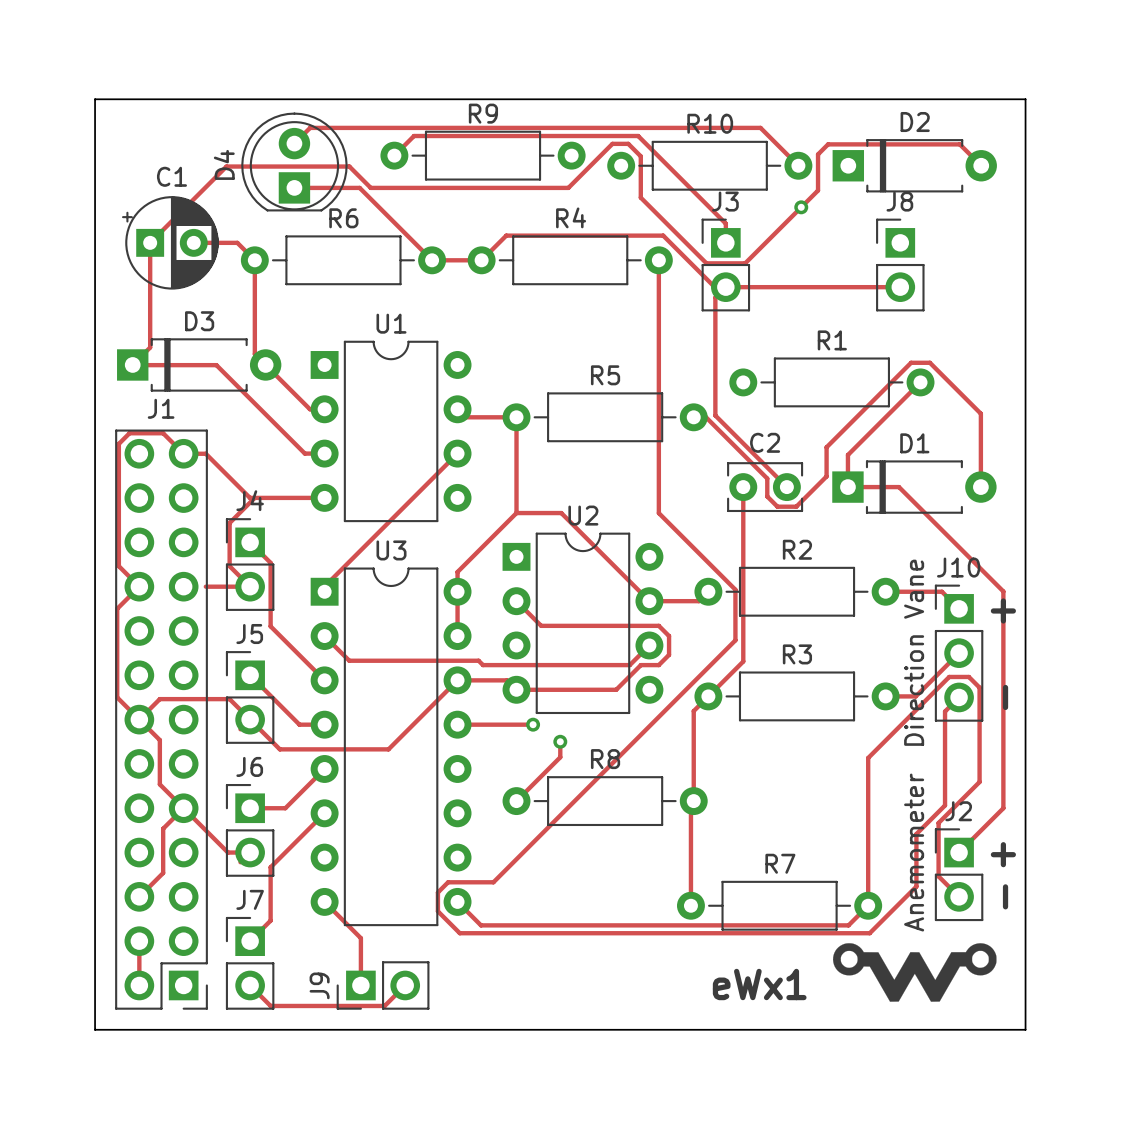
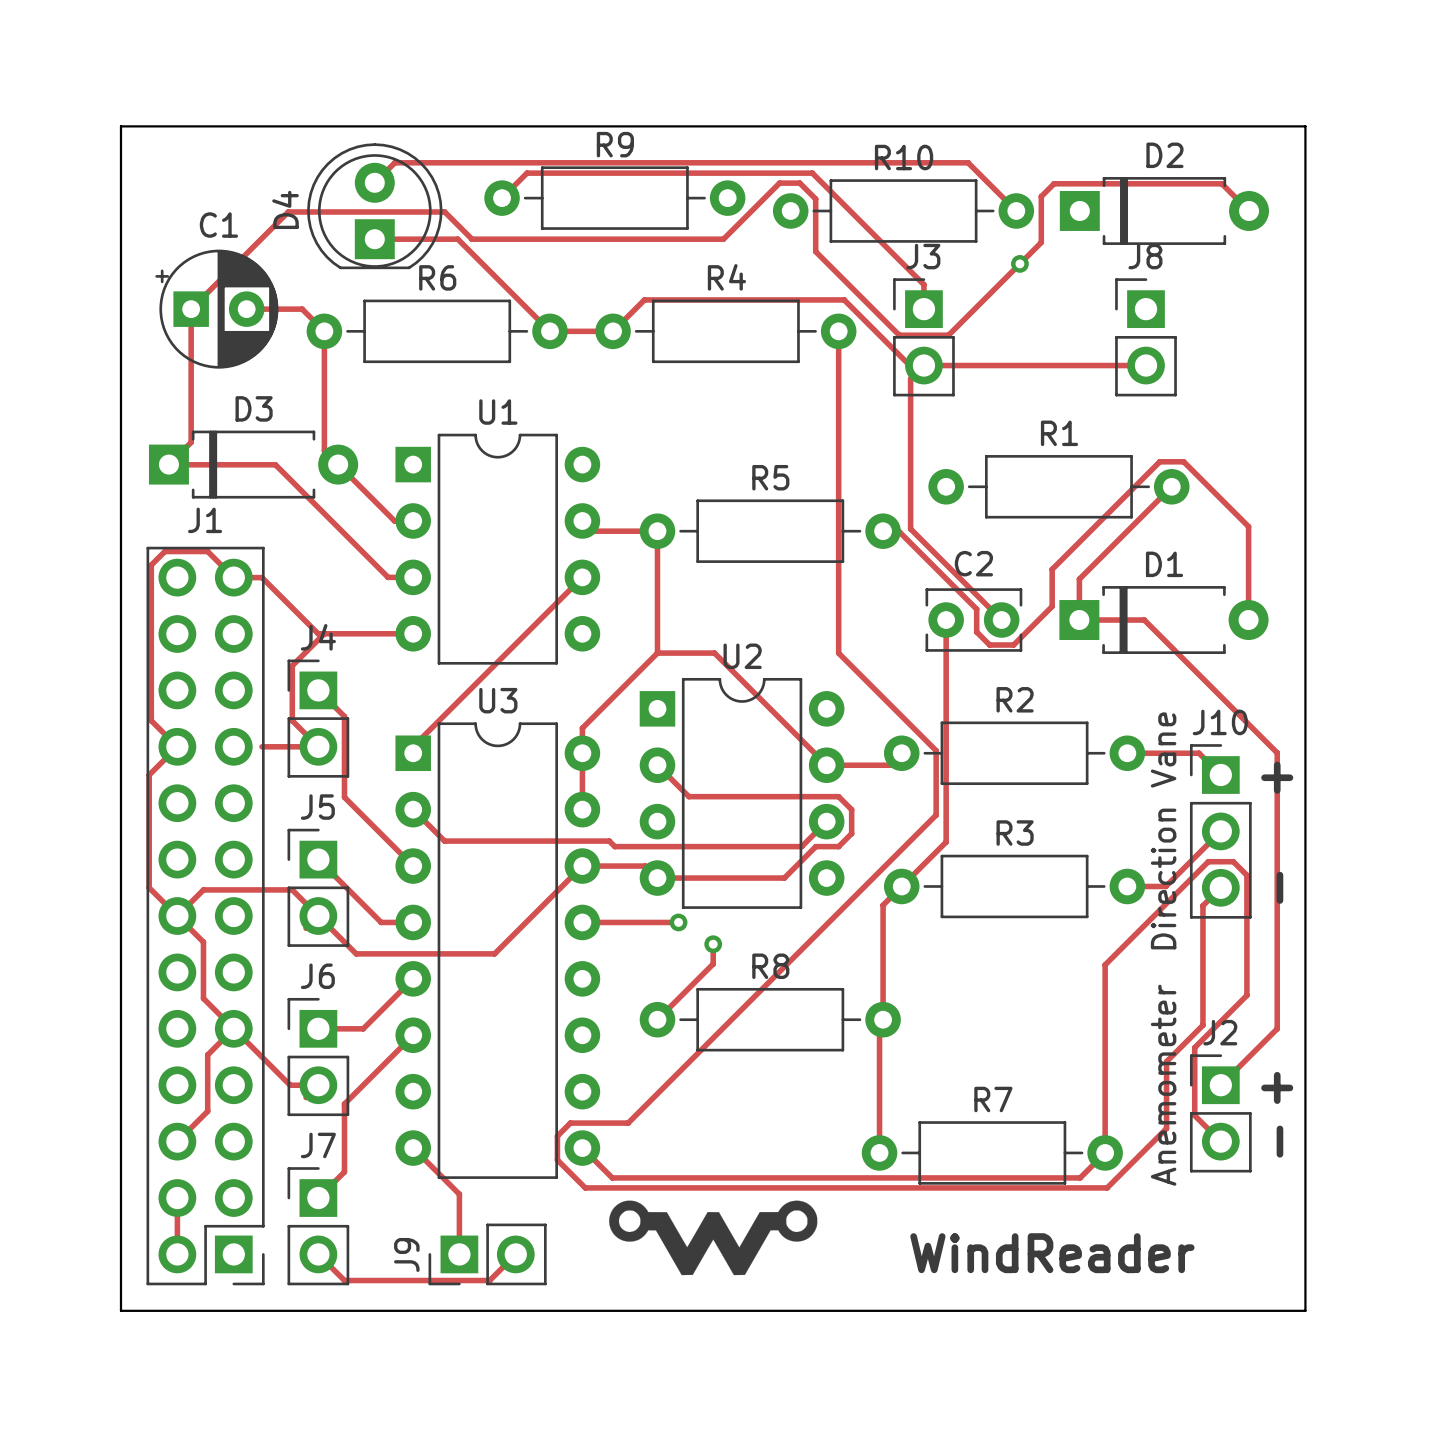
drawing position: (914, 972) -> (713, 1237)
text: eWx1 (759, 984) -> none
text: none -> WindReader (1052, 1253)

